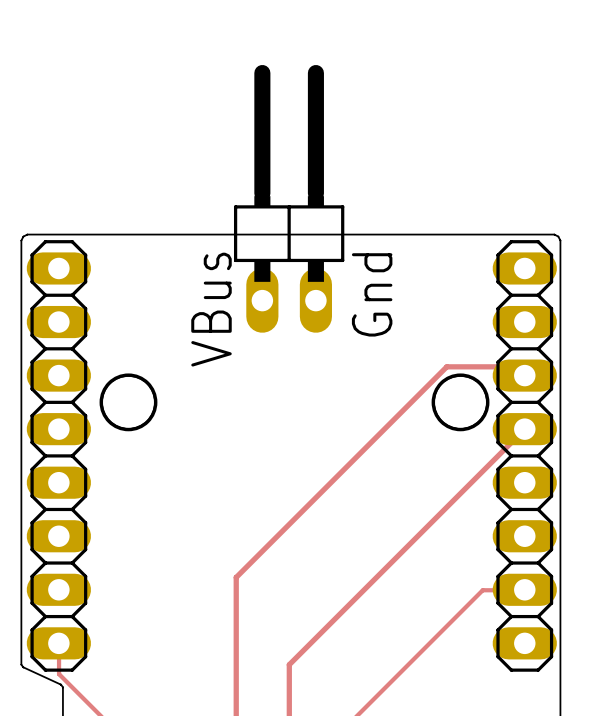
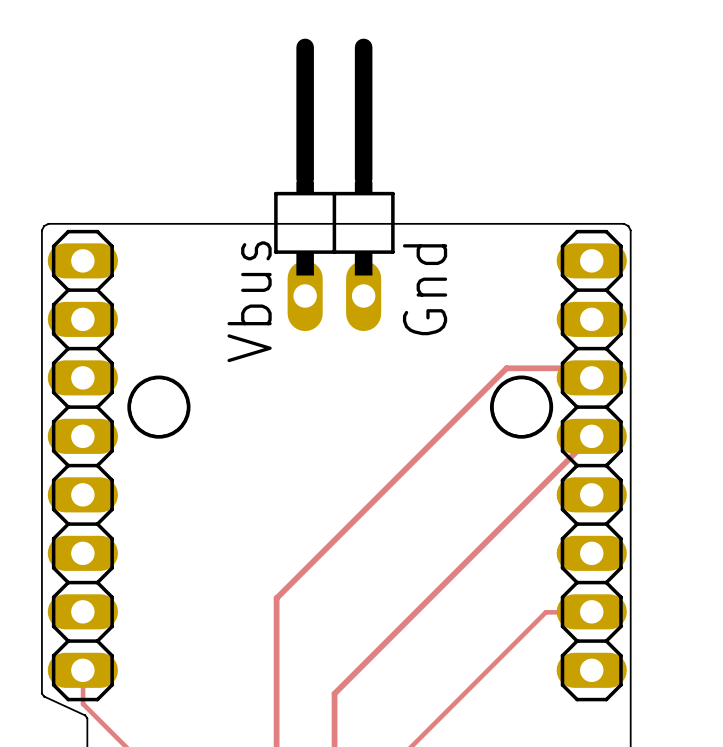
text: VBus (211, 309) -> Vbus (249, 301)

